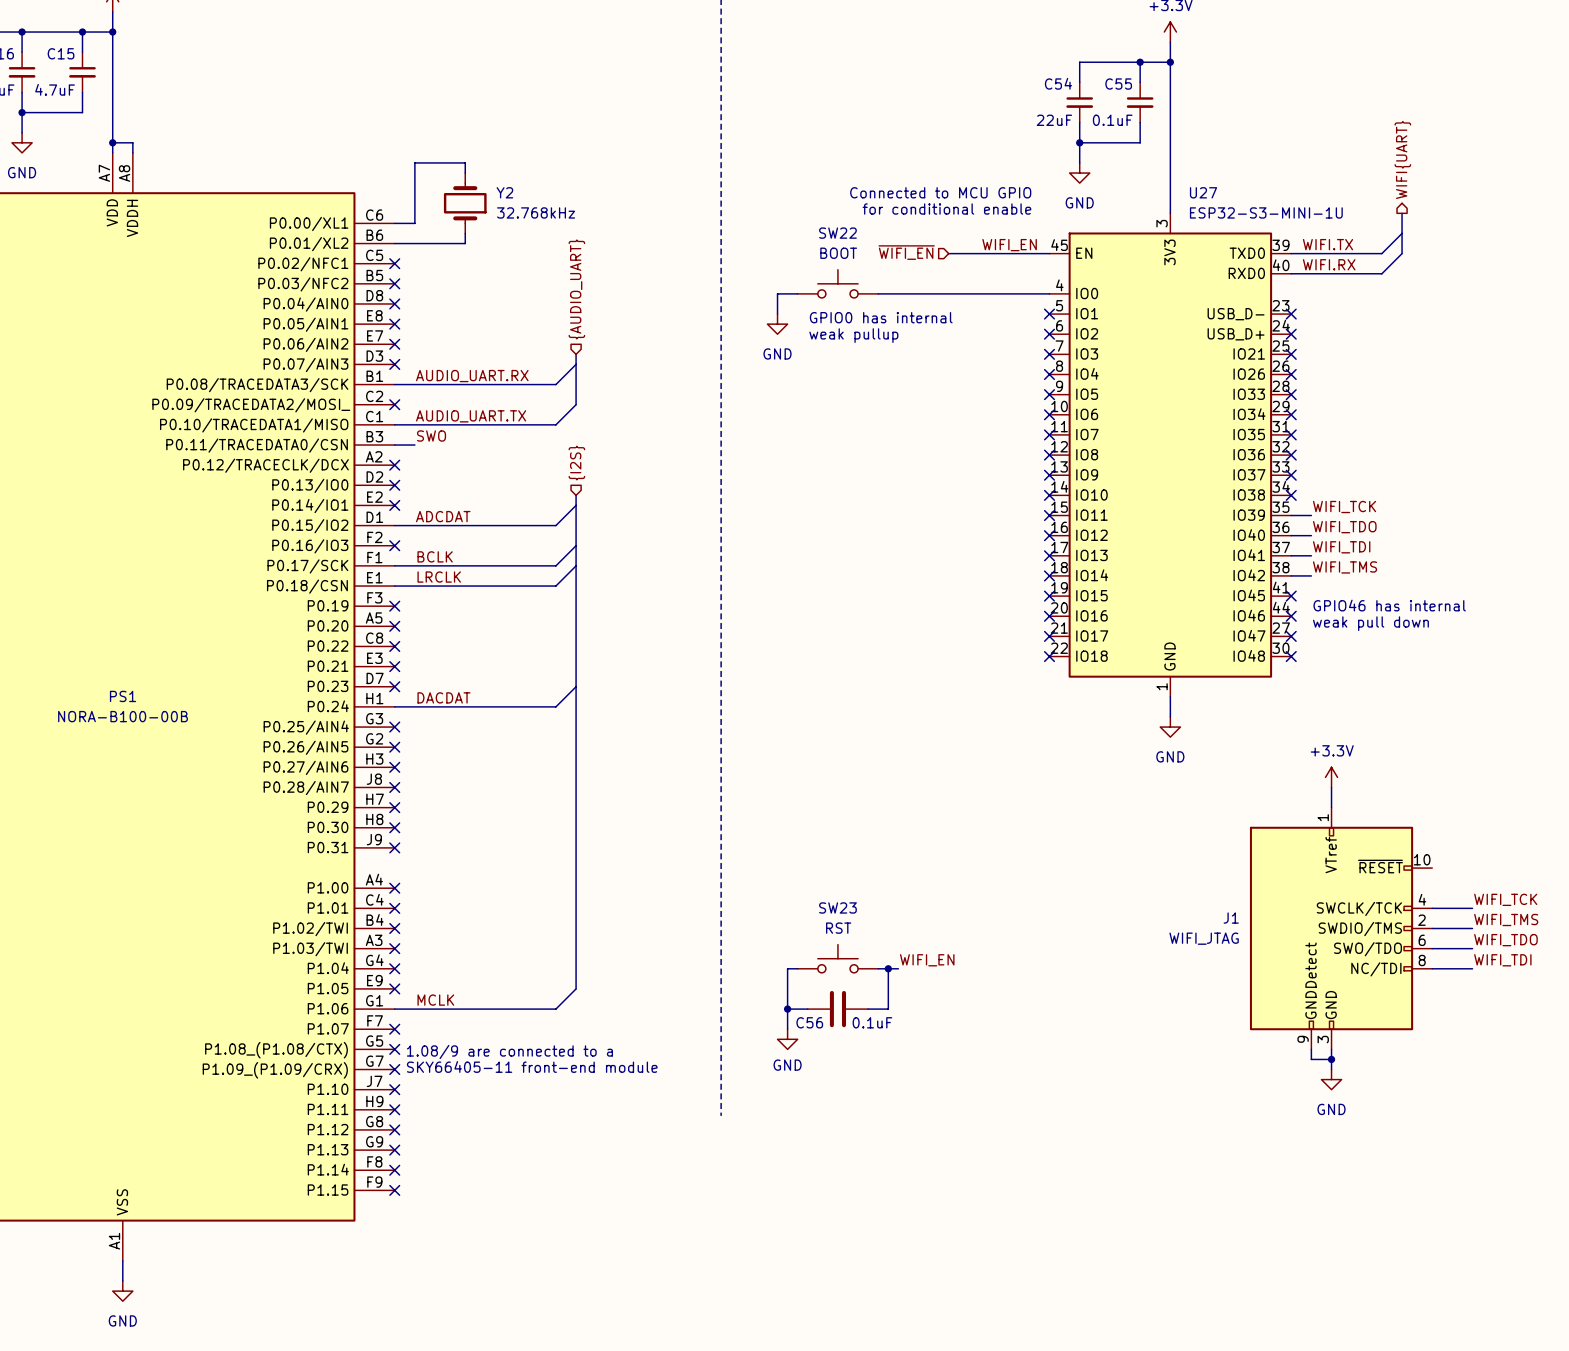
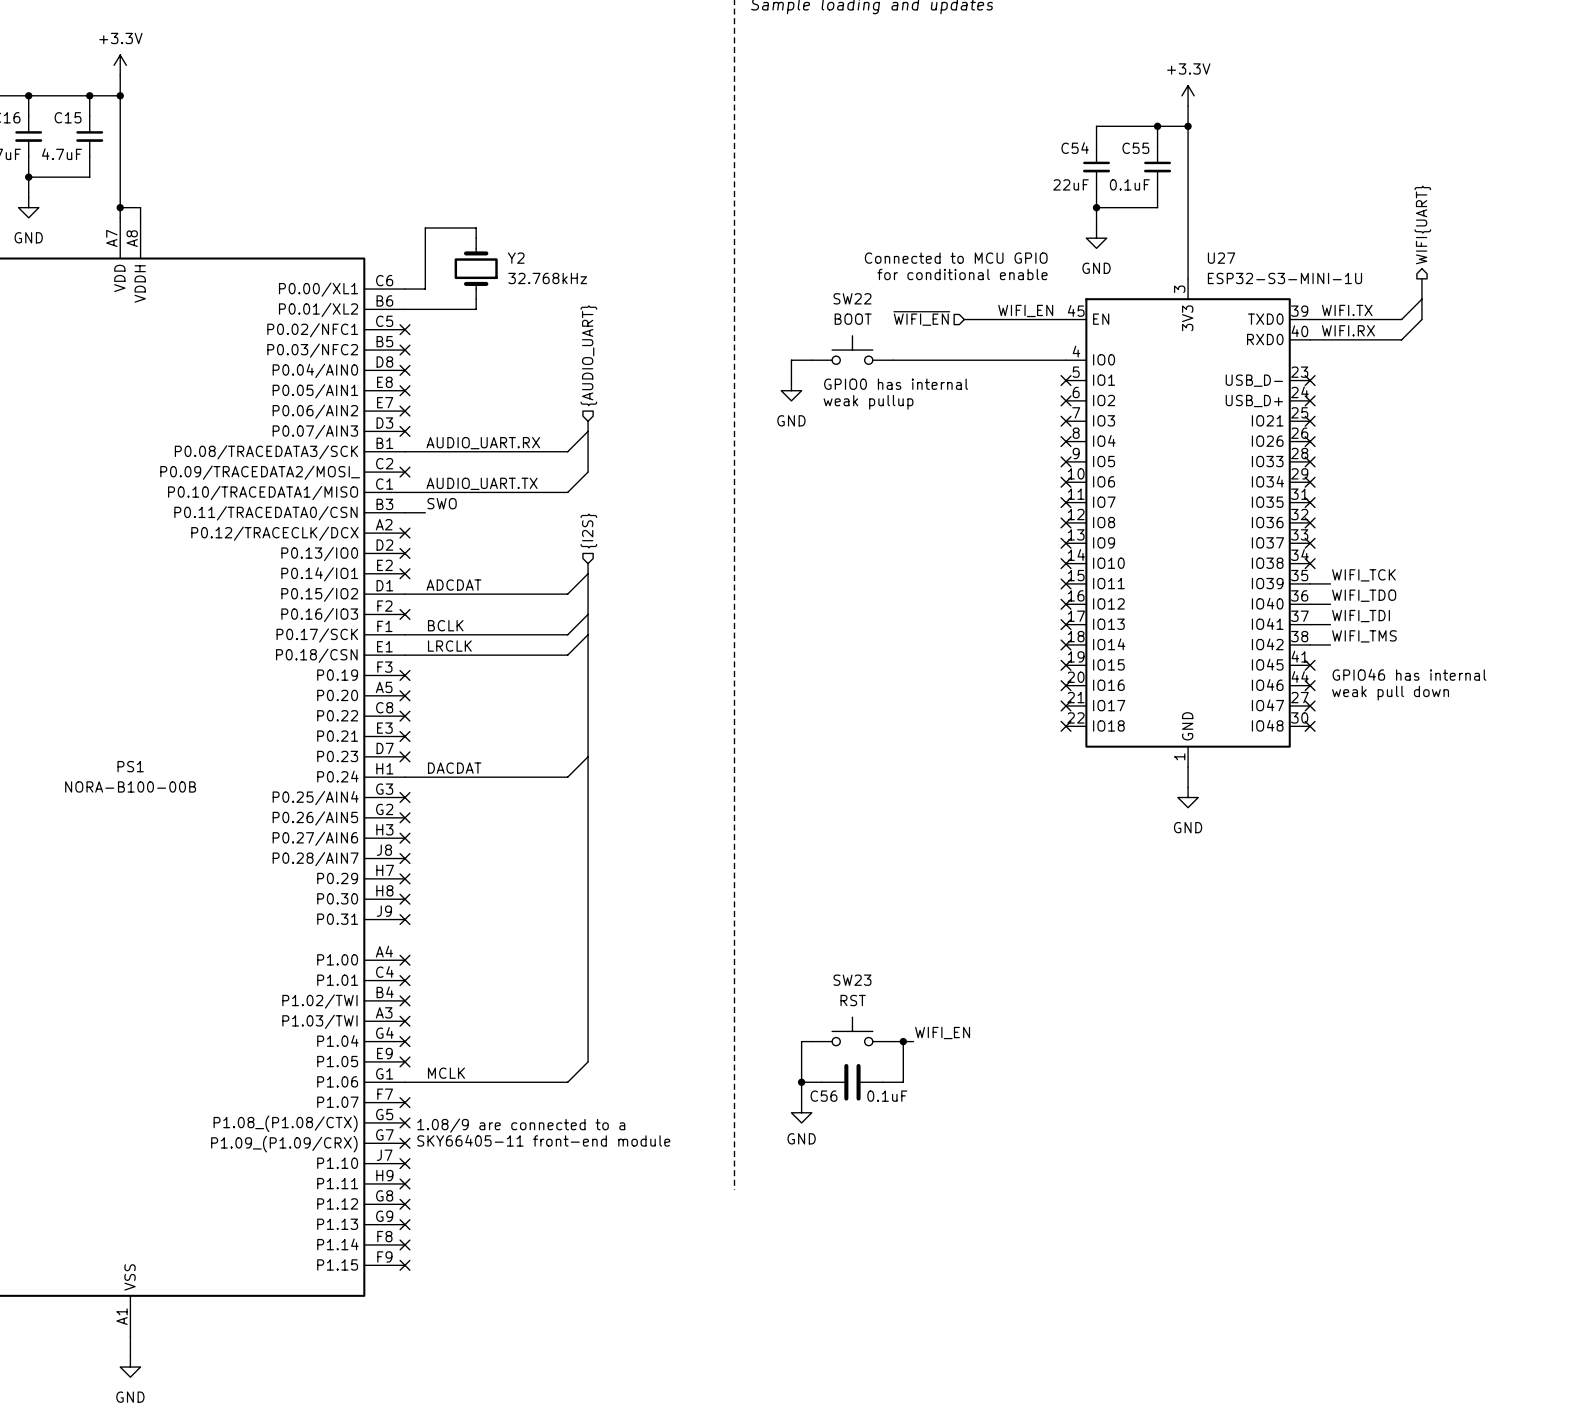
power symbol: +3.3V (1331, 777) -> none
wire: (1331, 787) (1331, 807) -> none
label: WIFI_TCK (1505, 899) -> none
wire: (1432, 908) (1472, 908) -> none
label: WIFI_TMS (1506, 919) -> none
J1: WIFI_JTAG (1341, 928) -> none
wire: (1432, 928) (1472, 928) -> none
label: WIFI_TDO (1505, 940) -> none
wire: (1432, 948) (1472, 948) -> none
label: WIFI_TDI (1502, 960) -> none
wire: (1432, 968) (1472, 968) -> none
wire: (1311, 1049) (1311, 1059) (1331, 1059) -> none
wire: (1331, 1049) (1331, 1069) -> none
junction: (1331, 1059) -> none
power symbol: GND (1331, 1079) -> none

